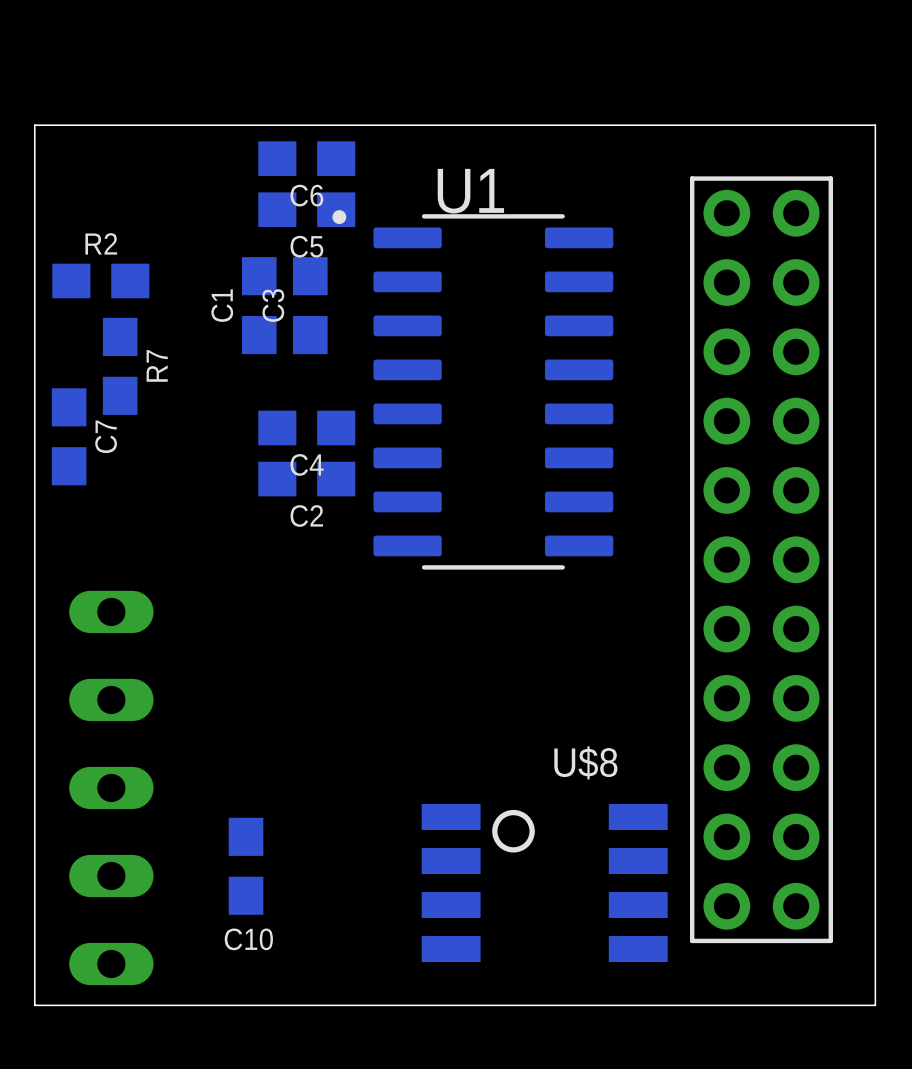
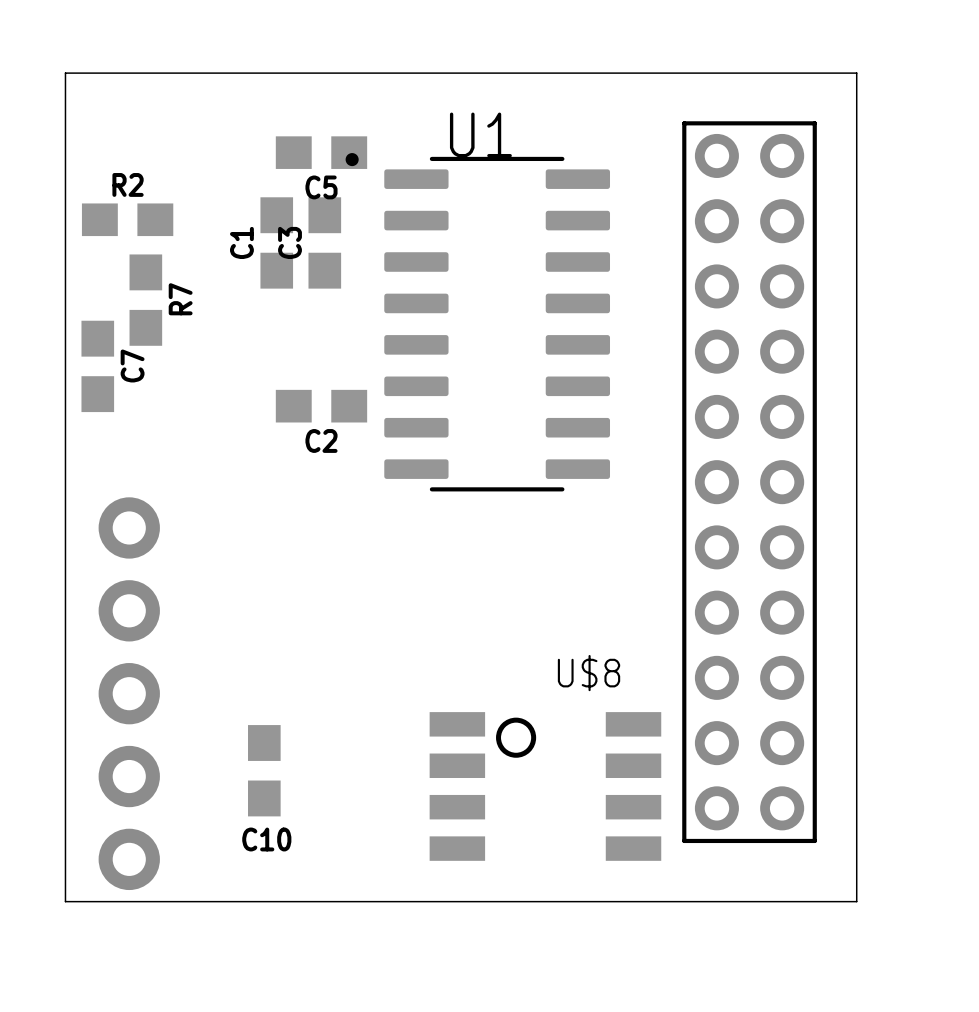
C6: (306, 158) -> none
C4: (306, 427) -> none
part footprint: [69, 590, 154, 986] -> [98, 497, 160, 891]

